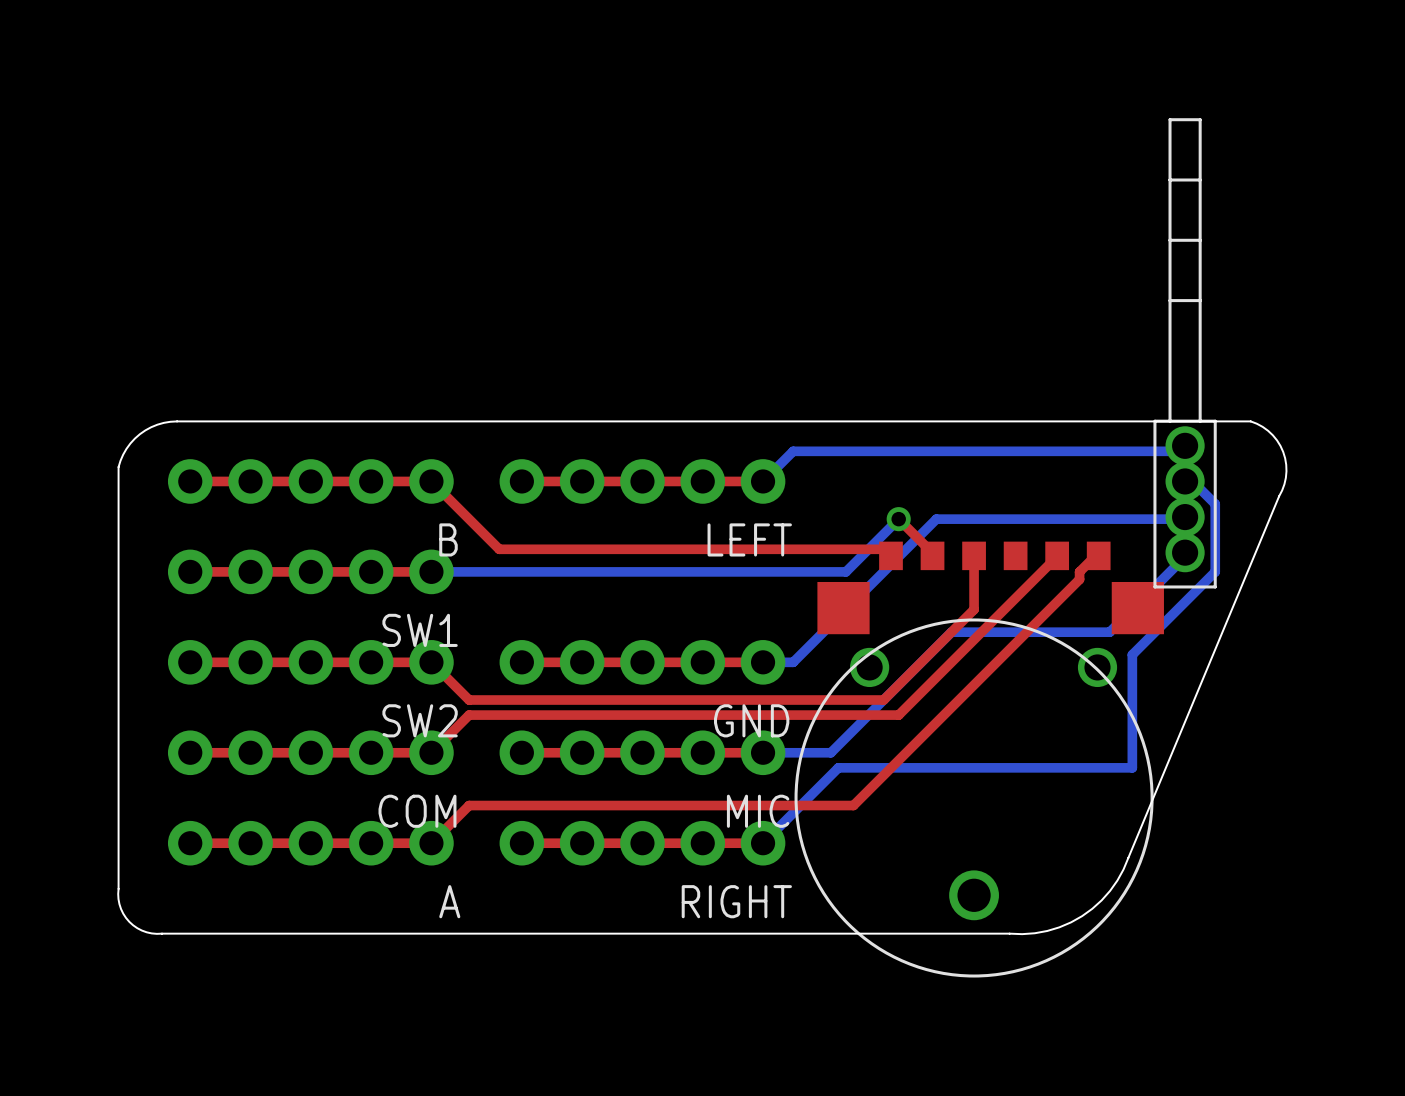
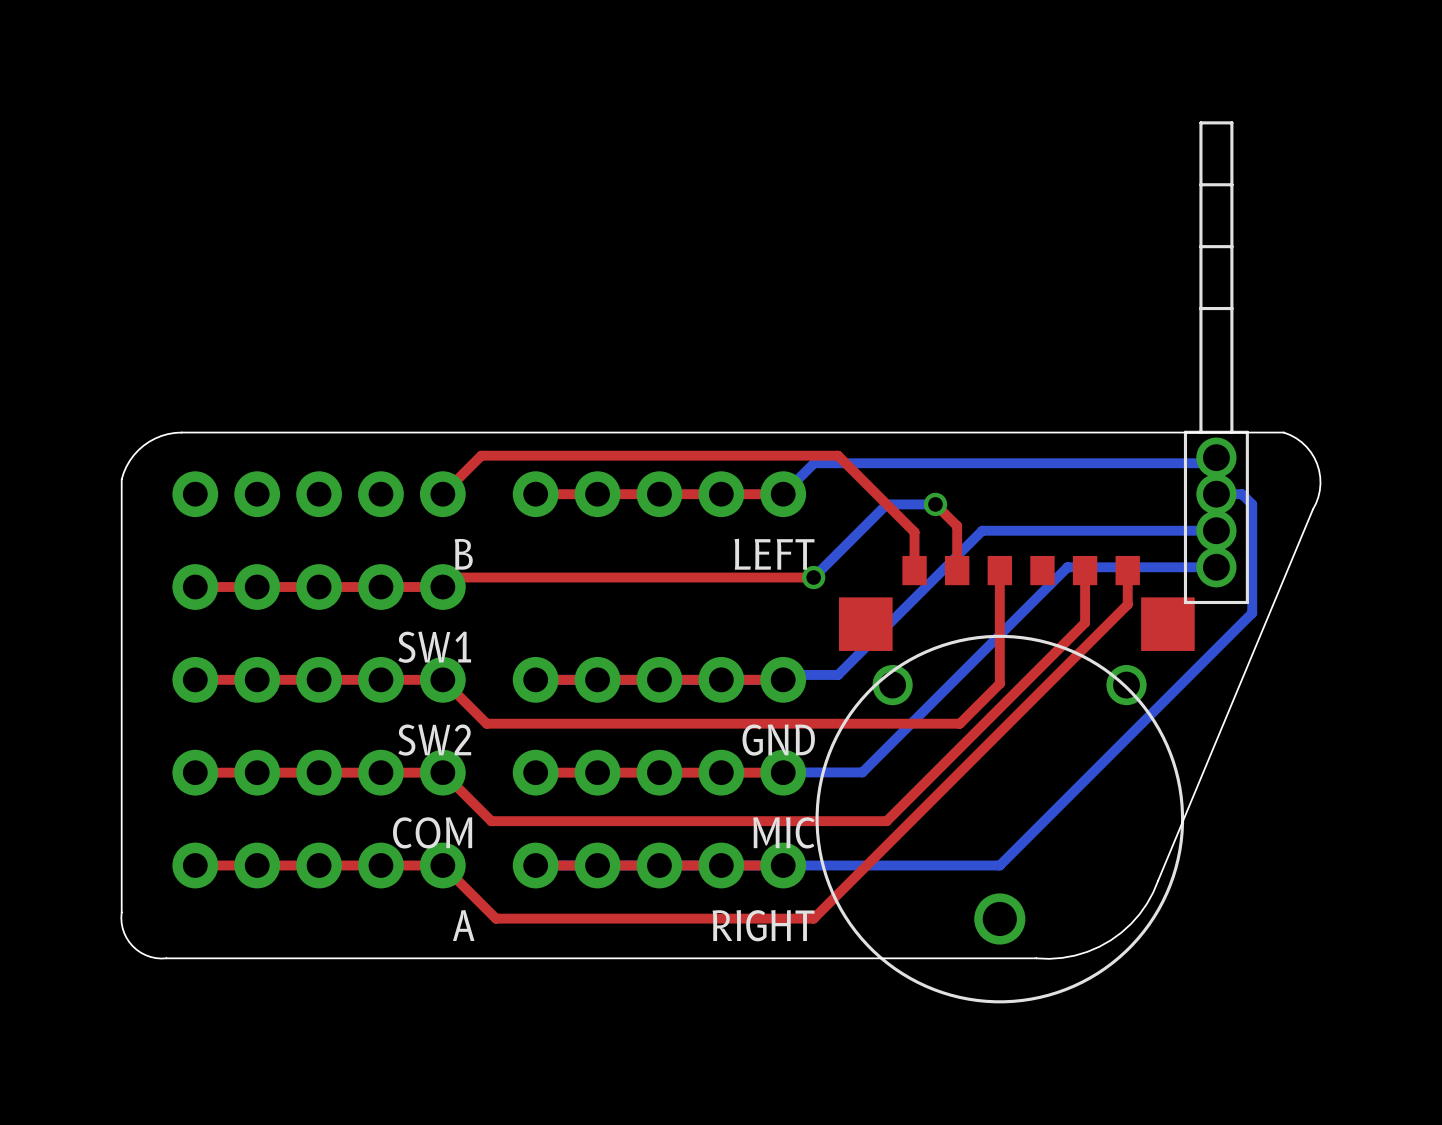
top track: (190, 481) (431, 481) (499, 549) (883, 549) (890, 555) -> (442, 494) (481, 455) (838, 455) (914, 532) (914, 570)
bottom track: (1192, 481) (1215, 504) (1215, 571) (1132, 654) (1132, 767) (838, 767) (763, 843) -> (1224, 494) (1242, 494) (1252, 504) (1252, 613) (999, 865) (535, 865)
bottom track: none -> (935, 504) (886, 504) (813, 577)
via: none -> (935, 504)
bottom track: none -> (1214, 530) (982, 530) (838, 674) (788, 674) (783, 679) (535, 679)
bottom track: (1185, 517) (1185, 519) (936, 519) (793, 662) (763, 662) -> none
top track: (898, 519) (928, 549) (932, 555) -> (935, 504) (957, 526) (957, 570)
bottom track: (898, 519) (845, 571) (431, 571) -> none
via: (898, 519) -> none
bottom track: (1185, 552) (1185, 556) (1109, 632) (951, 632) (830, 752) (763, 752) -> (1214, 567) (1067, 567) (862, 772) (783, 772)
top track: (1057, 555) (898, 715) (469, 715) (431, 752) -> (1085, 570) (1085, 622) (886, 821) (491, 821) (442, 772)
top track: (1098, 555) (1094, 556) (1079, 571) (1079, 579) (853, 805) (469, 805) (431, 843) -> (1127, 570) (1127, 604) (813, 918) (495, 918) (442, 865)
top track: none -> (813, 577) (452, 577) (442, 587)
via: none -> (813, 577)
top track: (974, 609) (883, 700) (469, 700) -> (999, 625) (999, 683) (959, 723) (486, 723) (481, 718)

